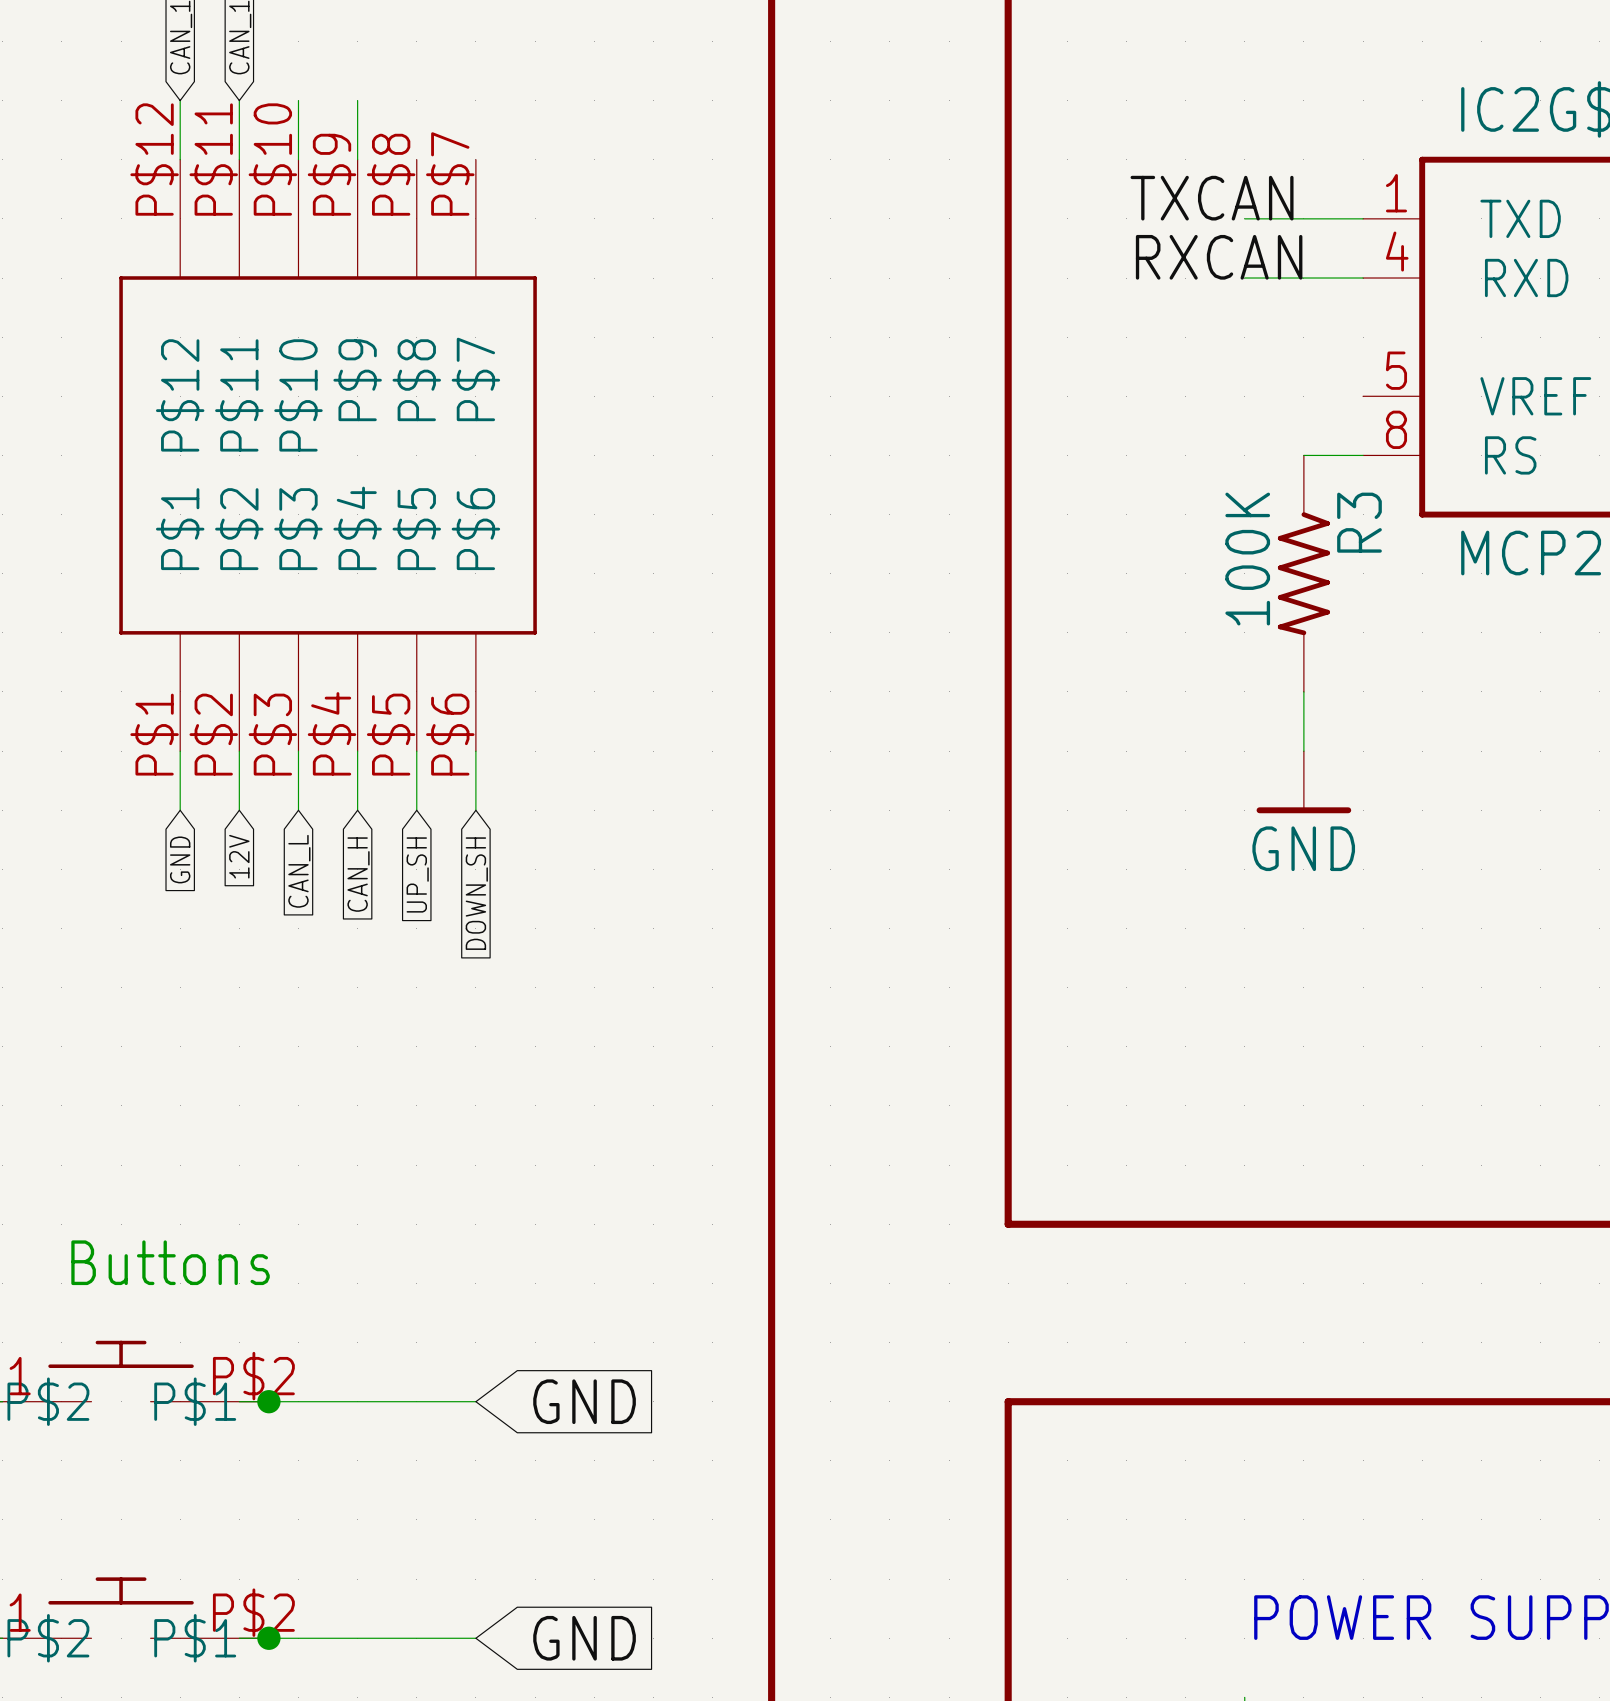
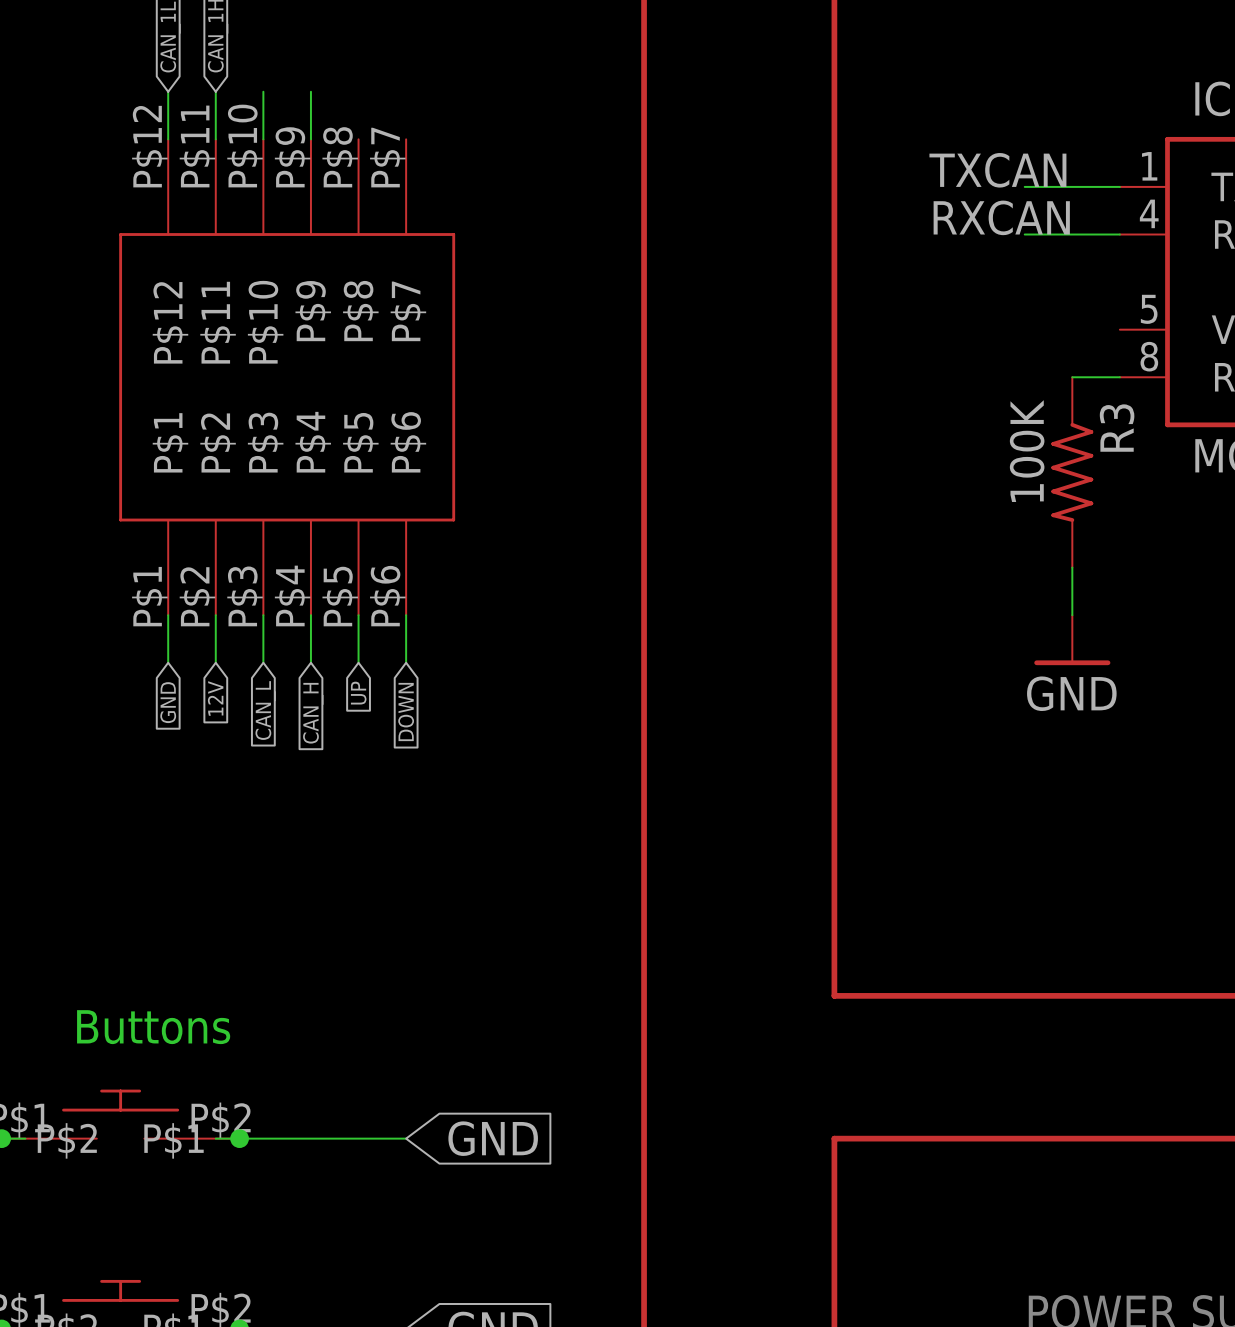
global label: UP_SH (417, 874) -> UP (358, 693)
global label: DOWN_SH (476, 893) -> DOWN (406, 712)

